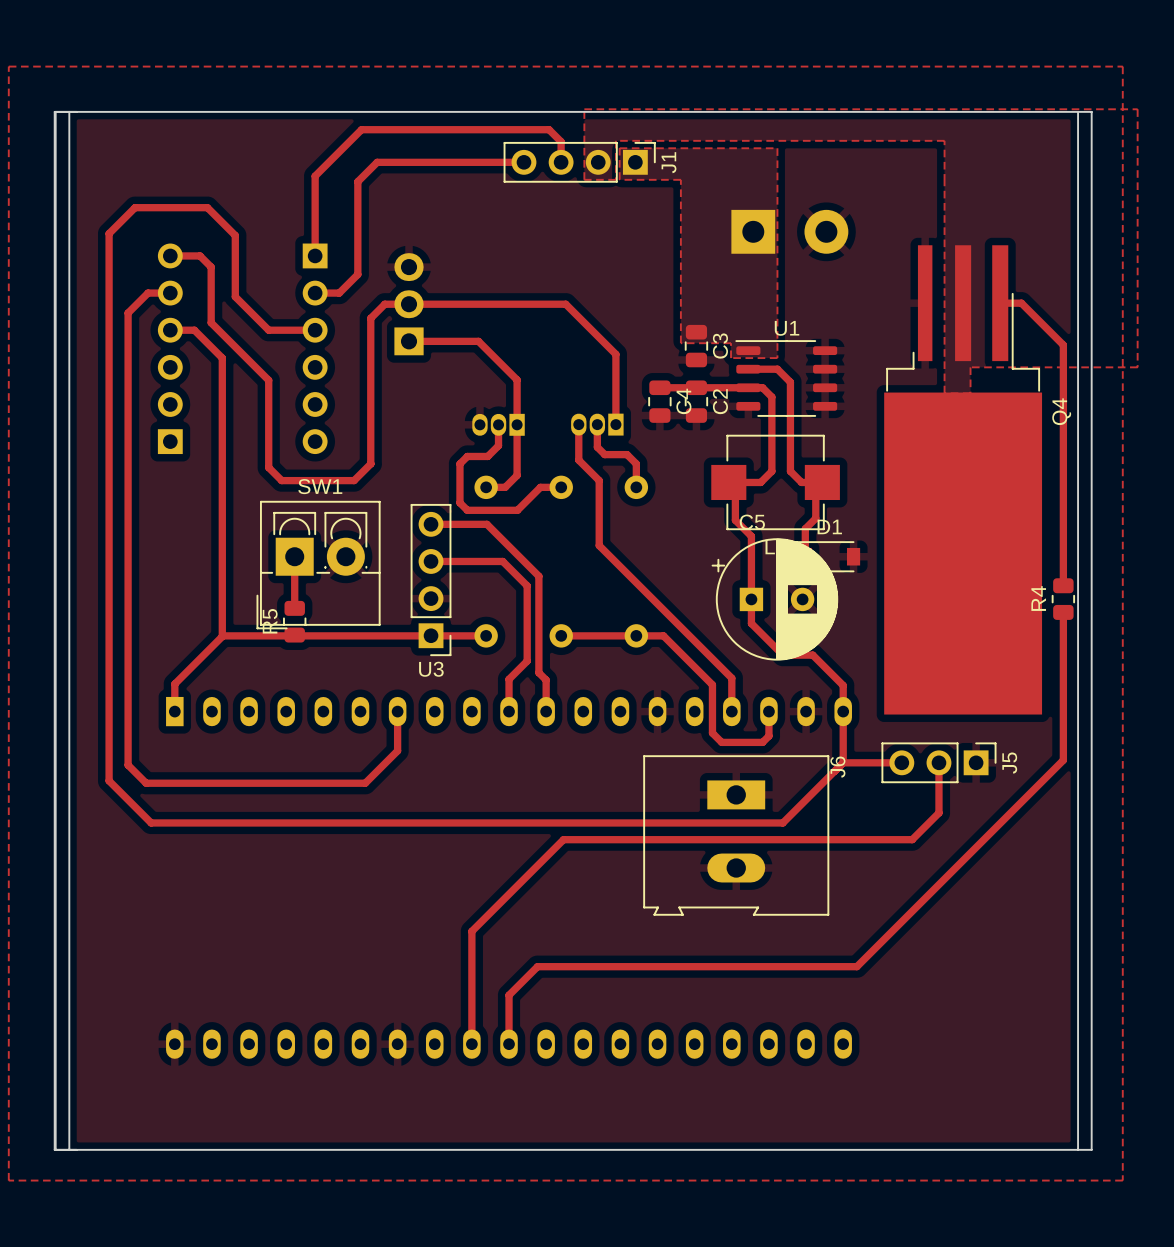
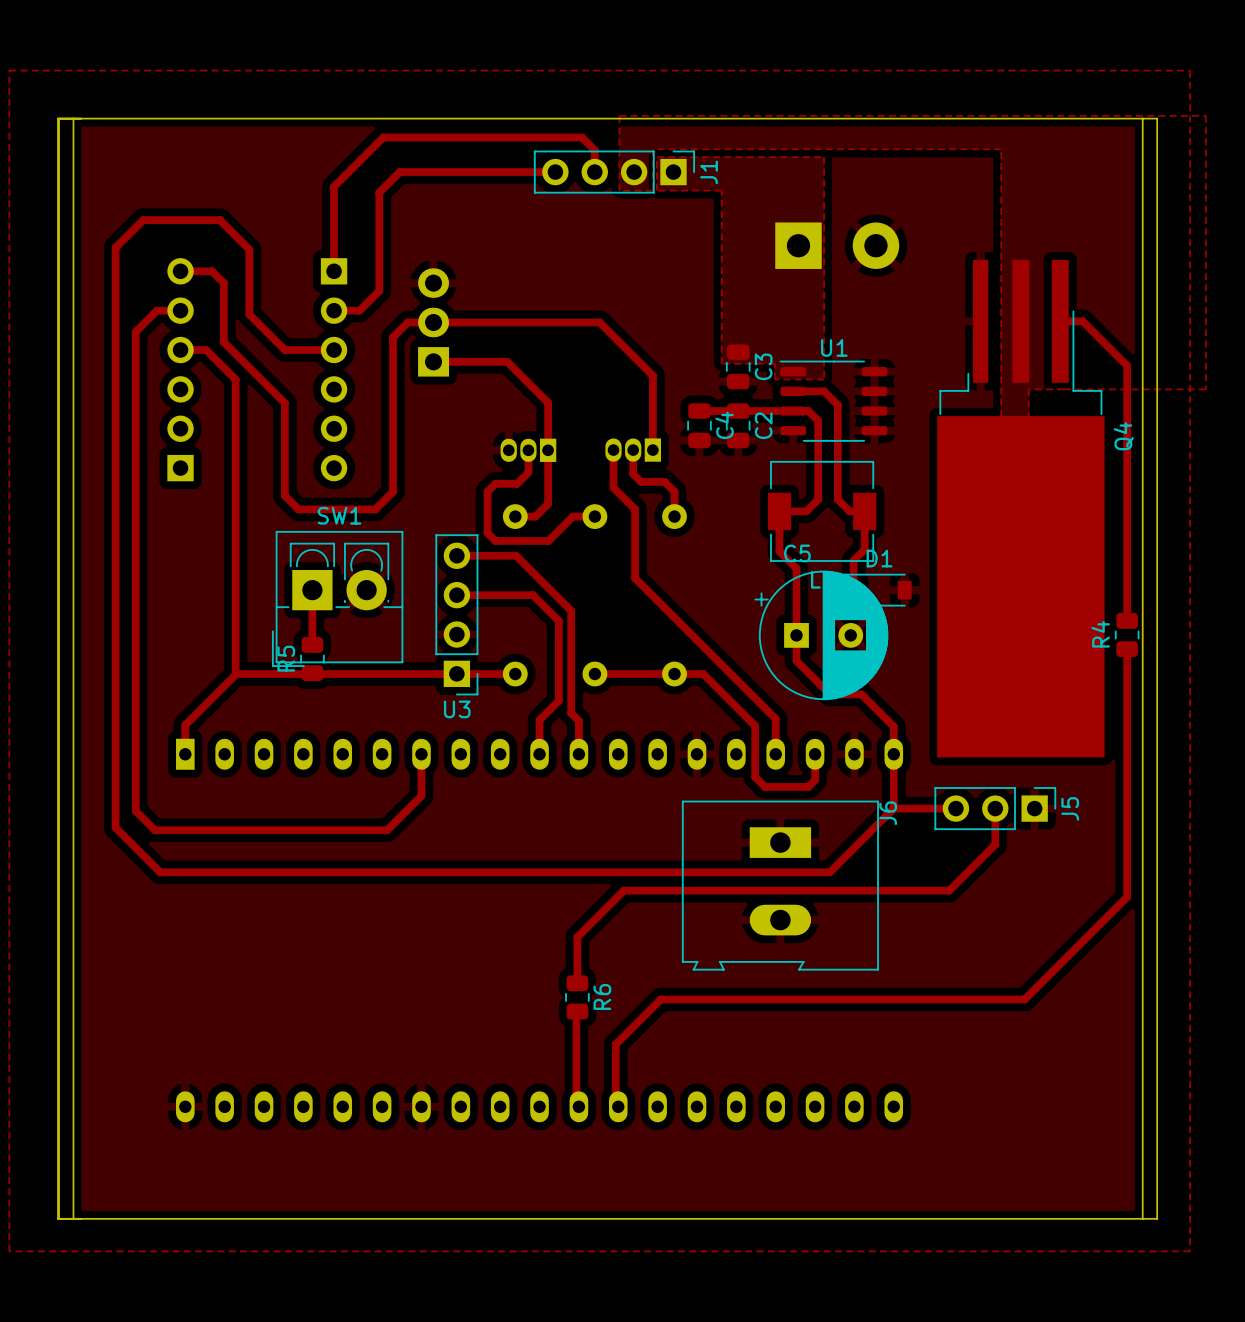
part footprint: [711, 434, 840, 531] -> [767, 460, 877, 562]
top track: (1063, 760) (856, 966) (537, 966) (509, 995) (509, 1044) -> (1127, 805) (1127, 897) (1024, 999) (660, 999) (615, 1044) (615, 1100)
top track: (938, 796) (938, 812) (912, 839) (563, 839) (471, 931) (471, 1044) -> (995, 844) (949, 890) (623, 890) (577, 937) (577, 983)
R6: none -> (577, 997)
top track: none -> (577, 1011) (576, 1100)

